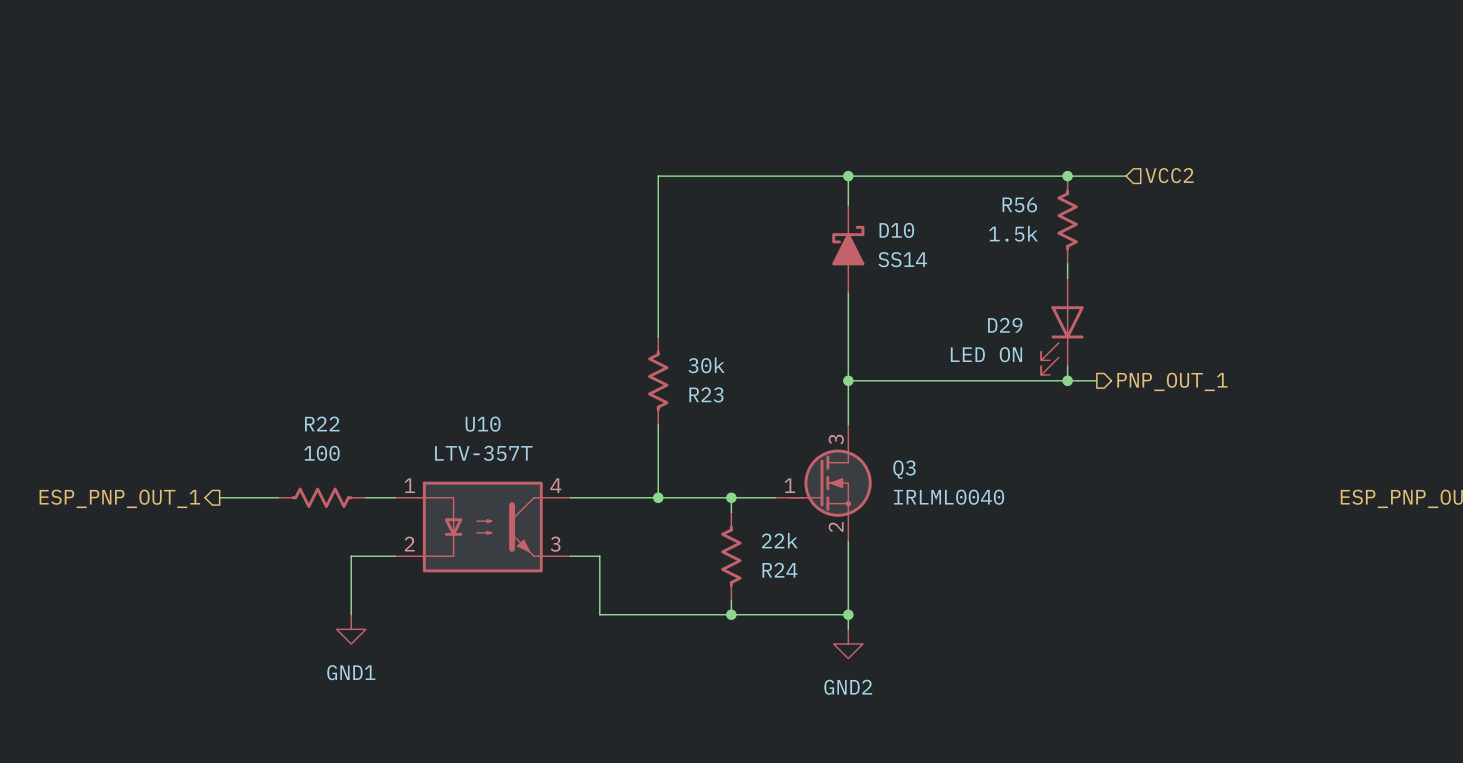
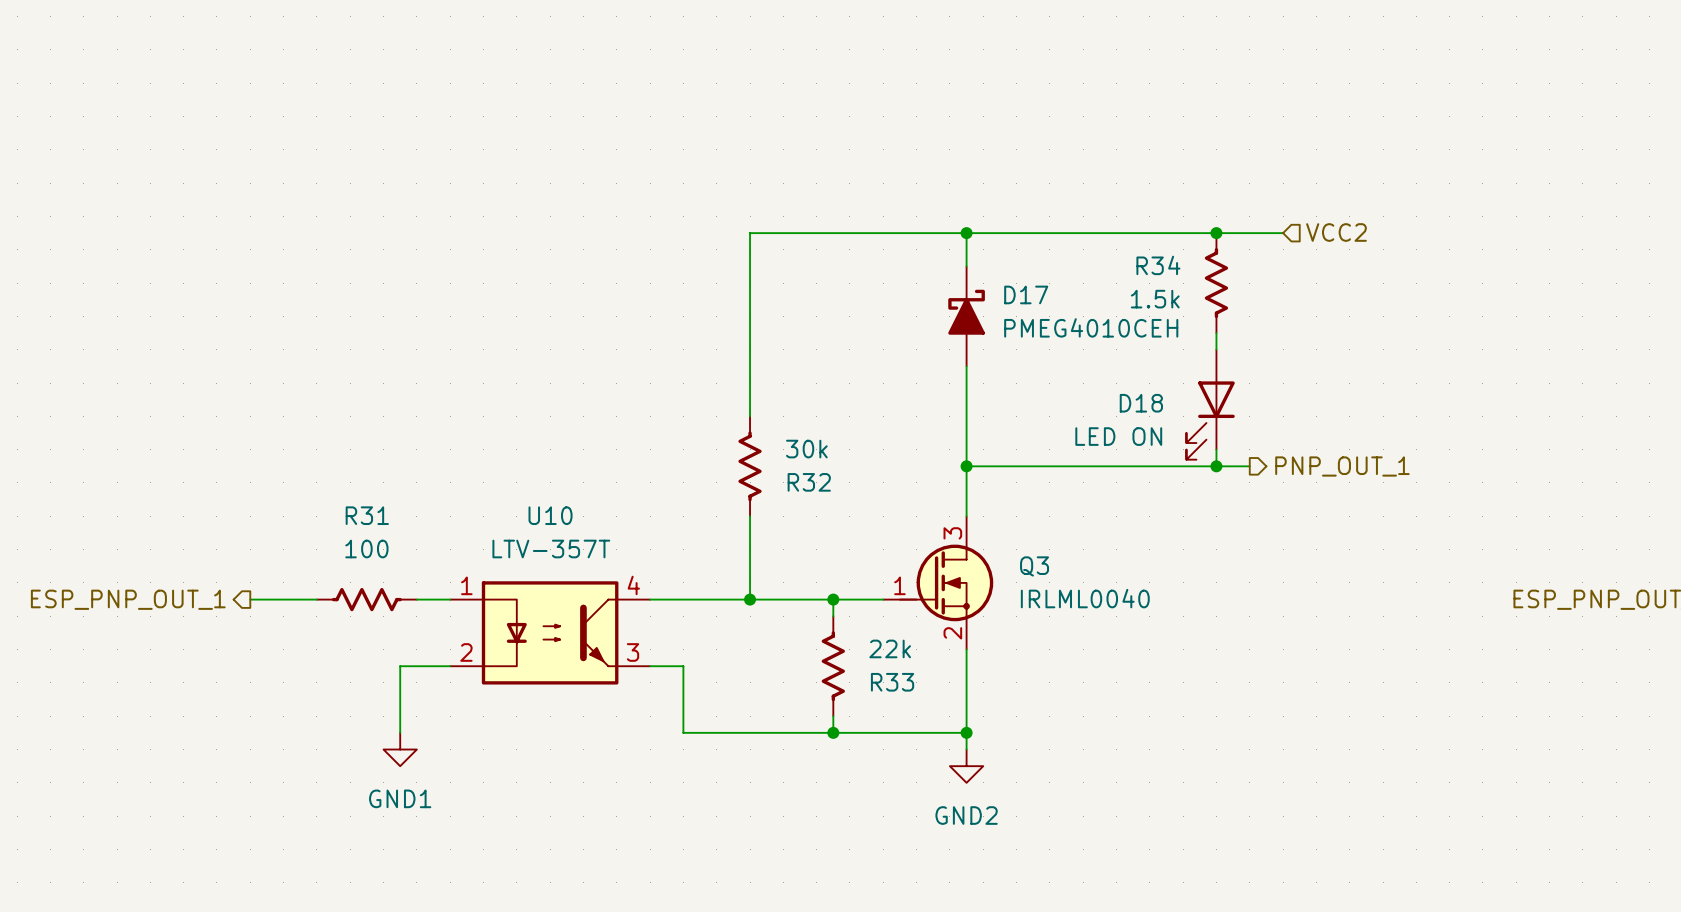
R56 name: R56 (1019, 204) -> R34 (1158, 265)
D10 name: D10 (896, 230) -> D17 (1026, 294)
D10 value: SS14 (902, 259) -> PMEG4010CEH (1091, 327)
D29 name: D29 (1005, 325) -> D18 (1141, 403)
R23 name: R23 (706, 394) -> R32 (809, 482)
R22 name: R22 (322, 424) -> R31 (367, 515)
R24 name: R24 (780, 570) -> R33 (892, 682)

